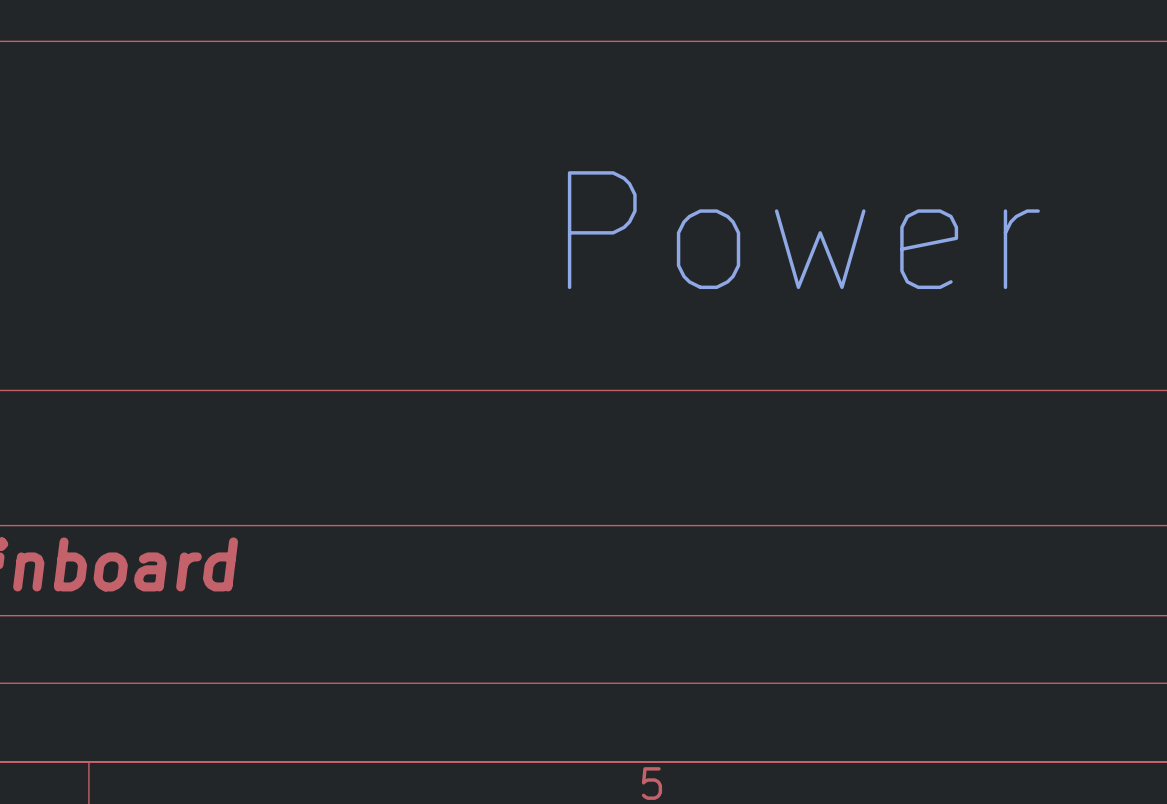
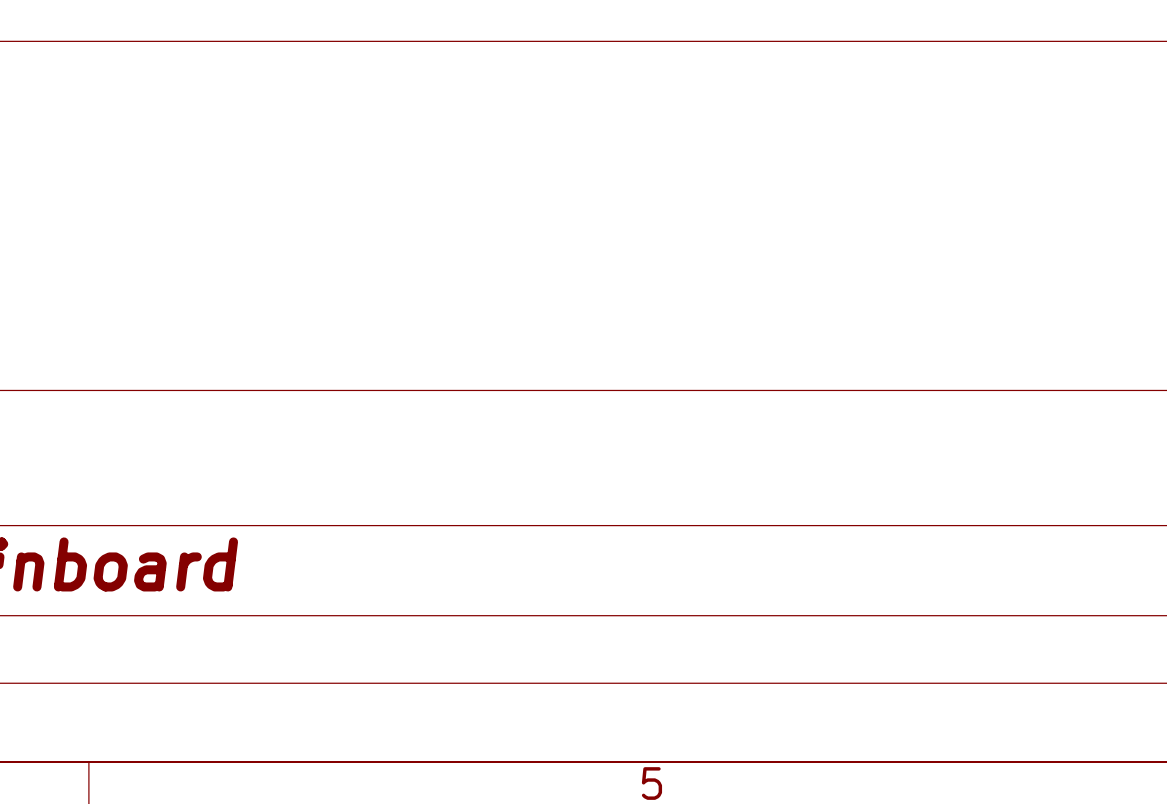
text: Power (803, 230) -> none

